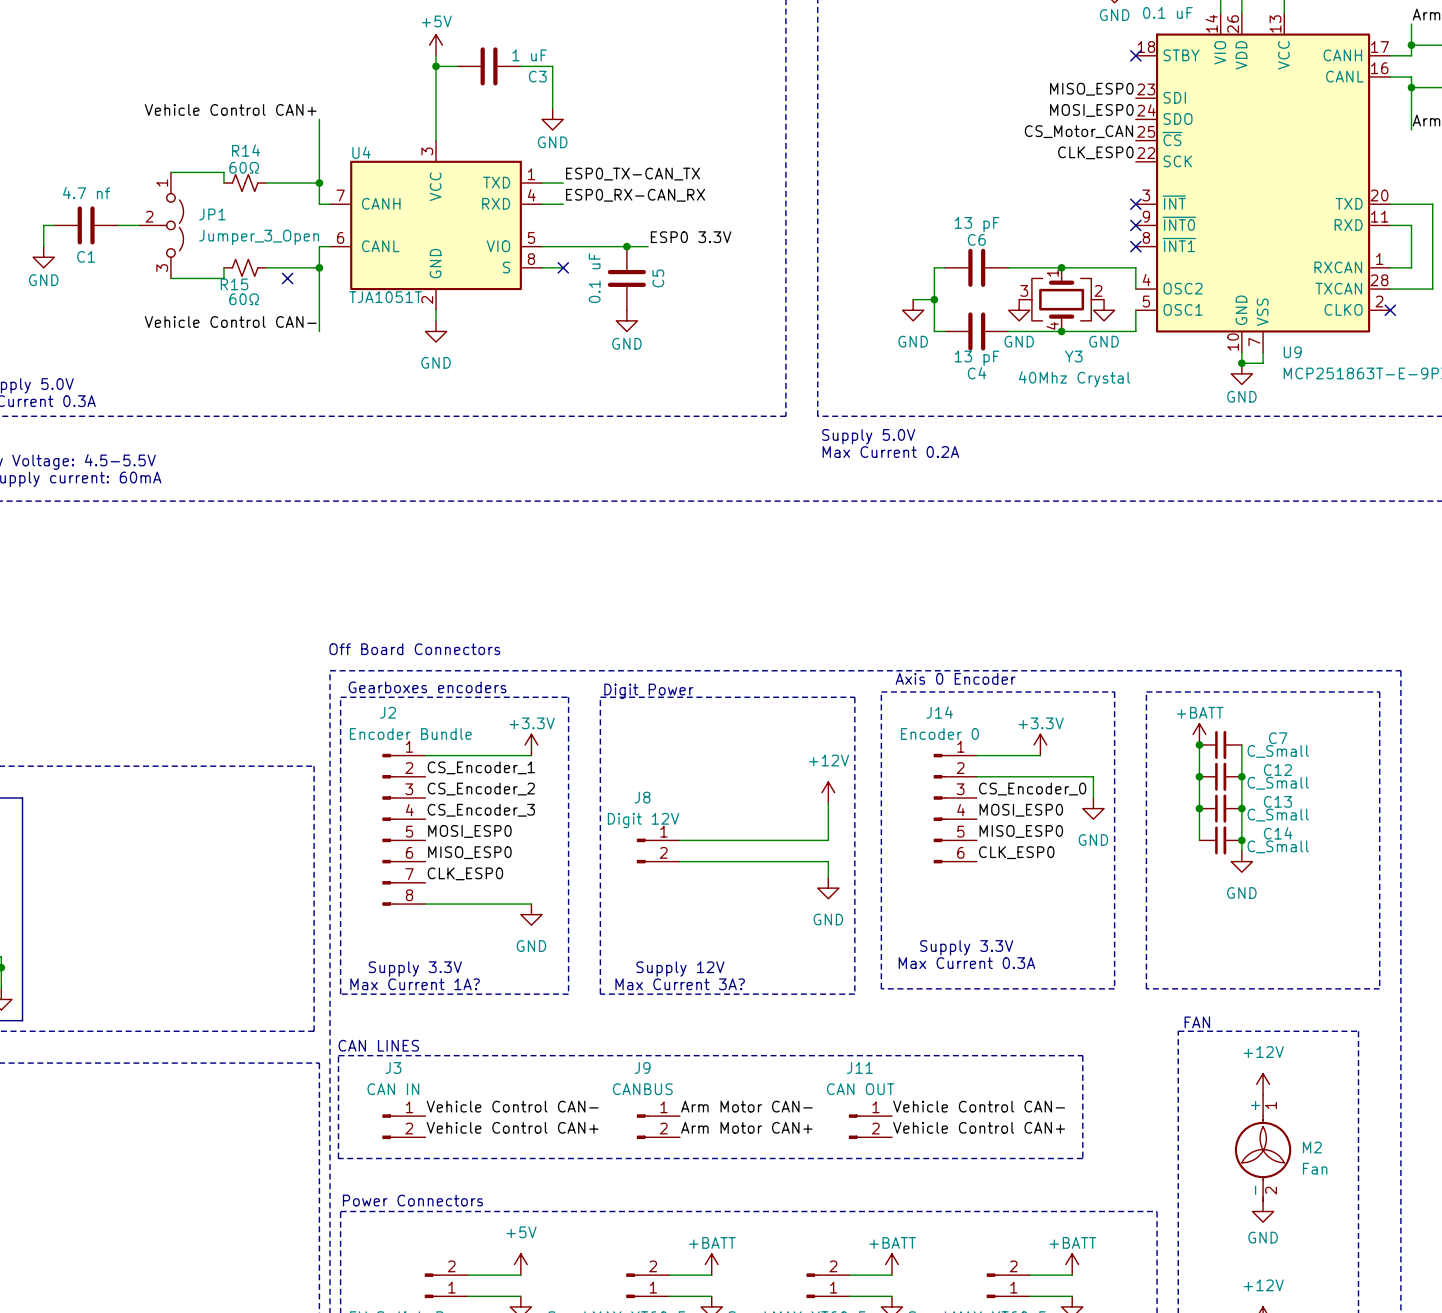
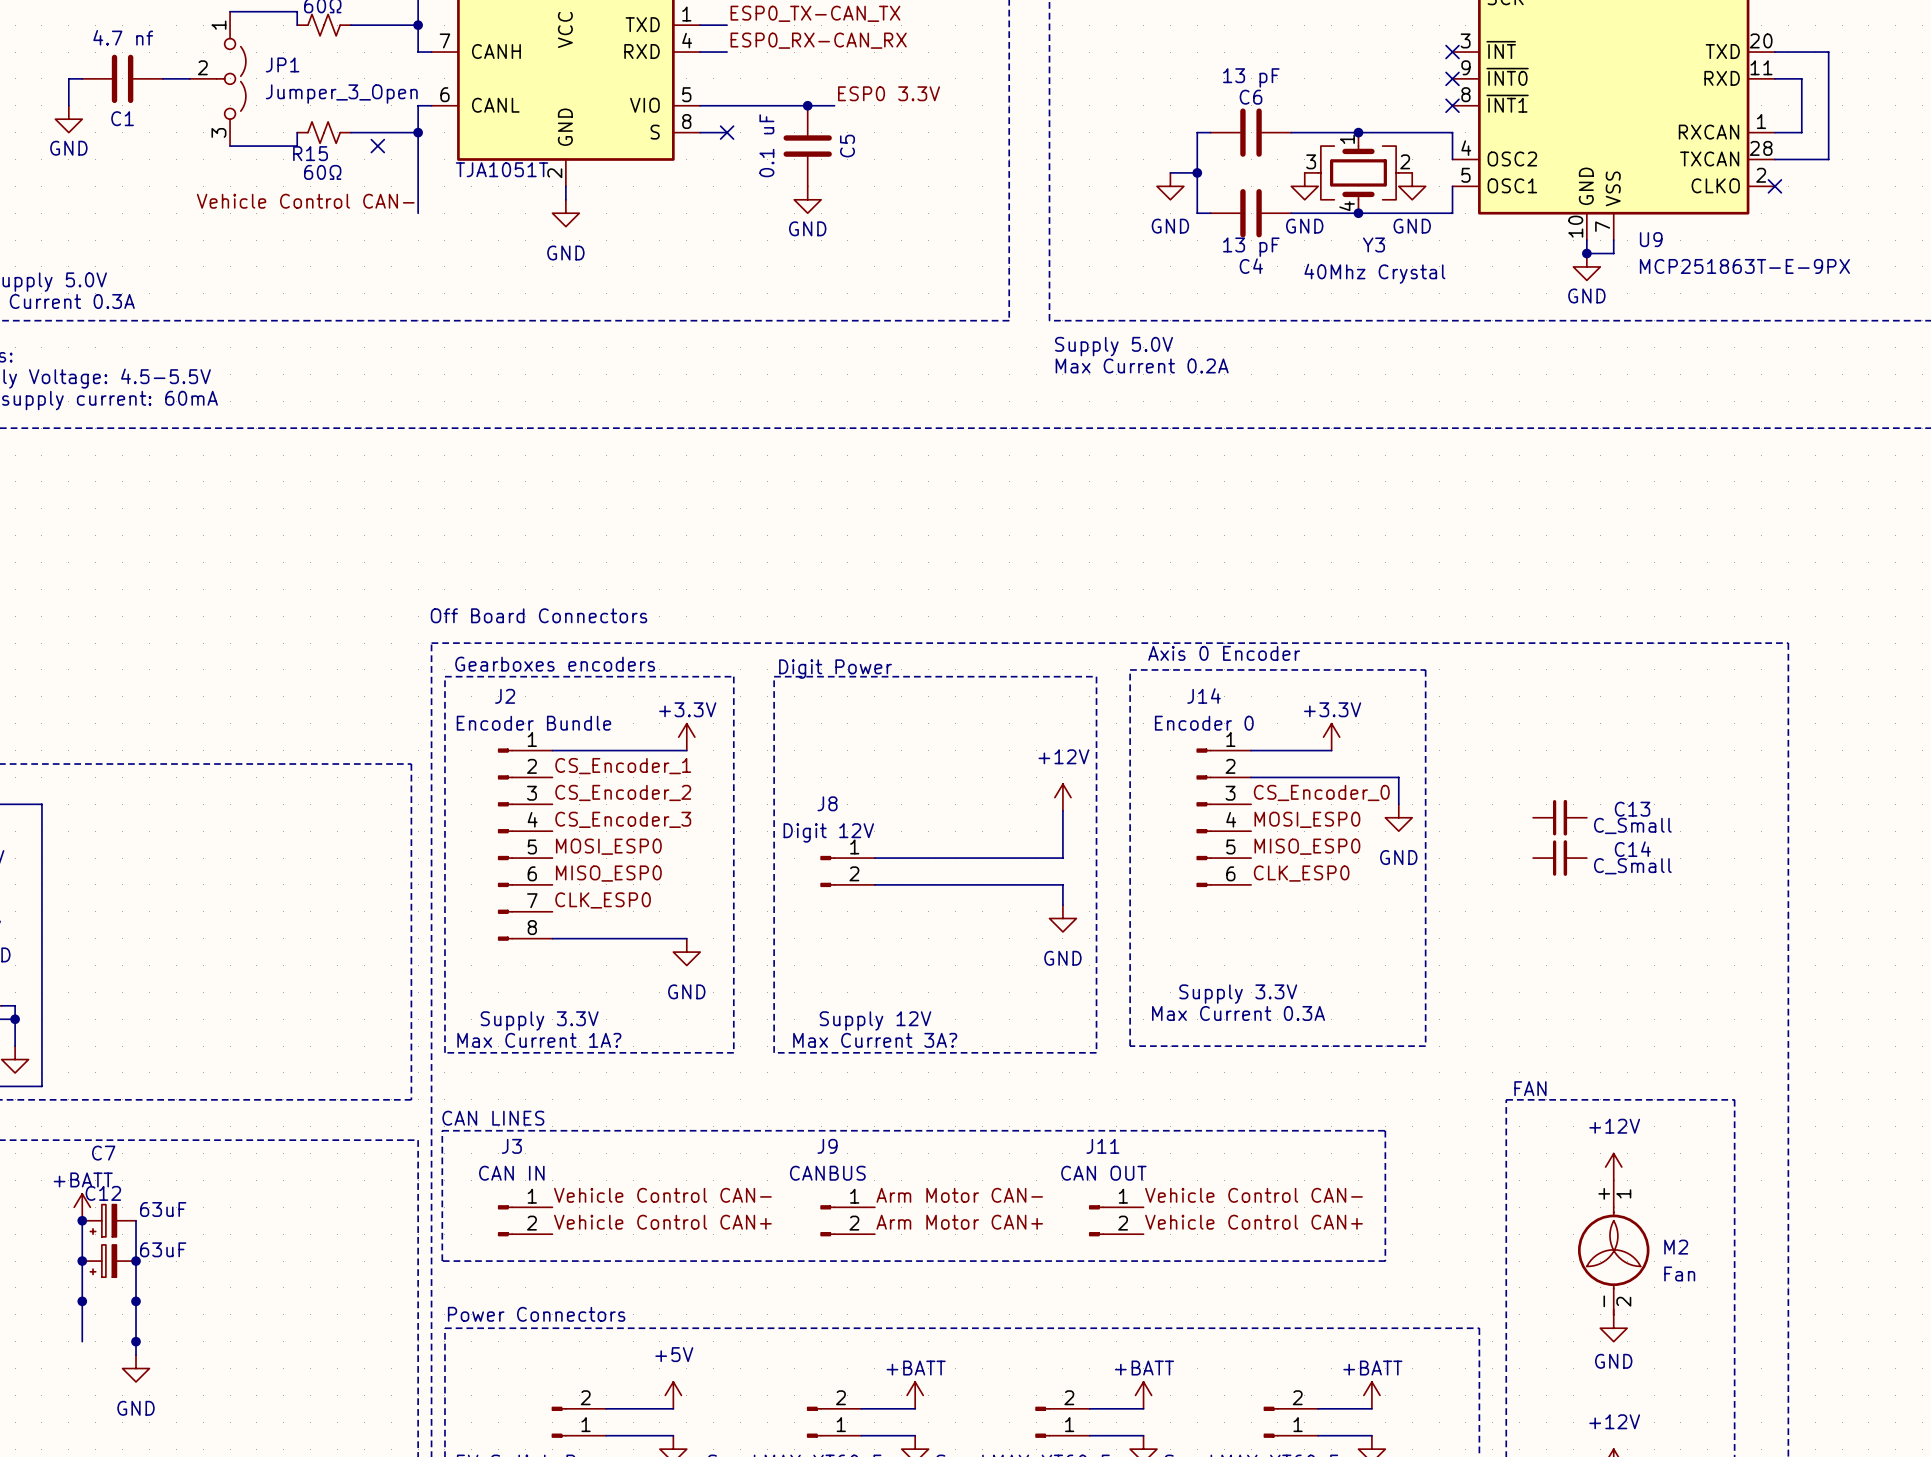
line: (1146, 691) (1379, 691) (1379, 988) (1146, 988) (1146, 691) -> none
C7 symbol: [1199, 730, 1242, 760] -> [82, 1204, 137, 1237]
power symbol: +BATT (1199, 734) -> none
C7 name position: C7 (1278, 738) -> C7 (103, 1153)
wire: (1199, 744) (1199, 840) -> none
junction: (1199, 744) -> none
wire: (1241, 744) (1241, 851) -> none
C7 value: C_Small (1278, 751) -> 63uF (163, 1209)
C12 symbol: [1199, 762, 1242, 791] -> [82, 1244, 137, 1278]
C12 name position: C12 (1277, 770) -> C12 (103, 1193)
junction: (1199, 776) -> none
junction: (1241, 776) -> none
C12 value: C_Small (1278, 783) -> 63uF (163, 1249)
junction: (1199, 808) -> none
junction: (1241, 808) -> none
junction: (1241, 840) -> none
power symbol: GND (1241, 861) -> none
power symbol: none -> +BATT (82, 1207)
wire: none -> (82, 1220) (82, 1341)
junction: none -> (82, 1220)
wire: none -> (136, 1220) (136, 1355)
junction: none -> (82, 1261)
junction: none -> (136, 1261)
junction: none -> (82, 1301)
junction: none -> (136, 1301)
junction: none -> (136, 1341)
power symbol: none -> GND (136, 1368)

